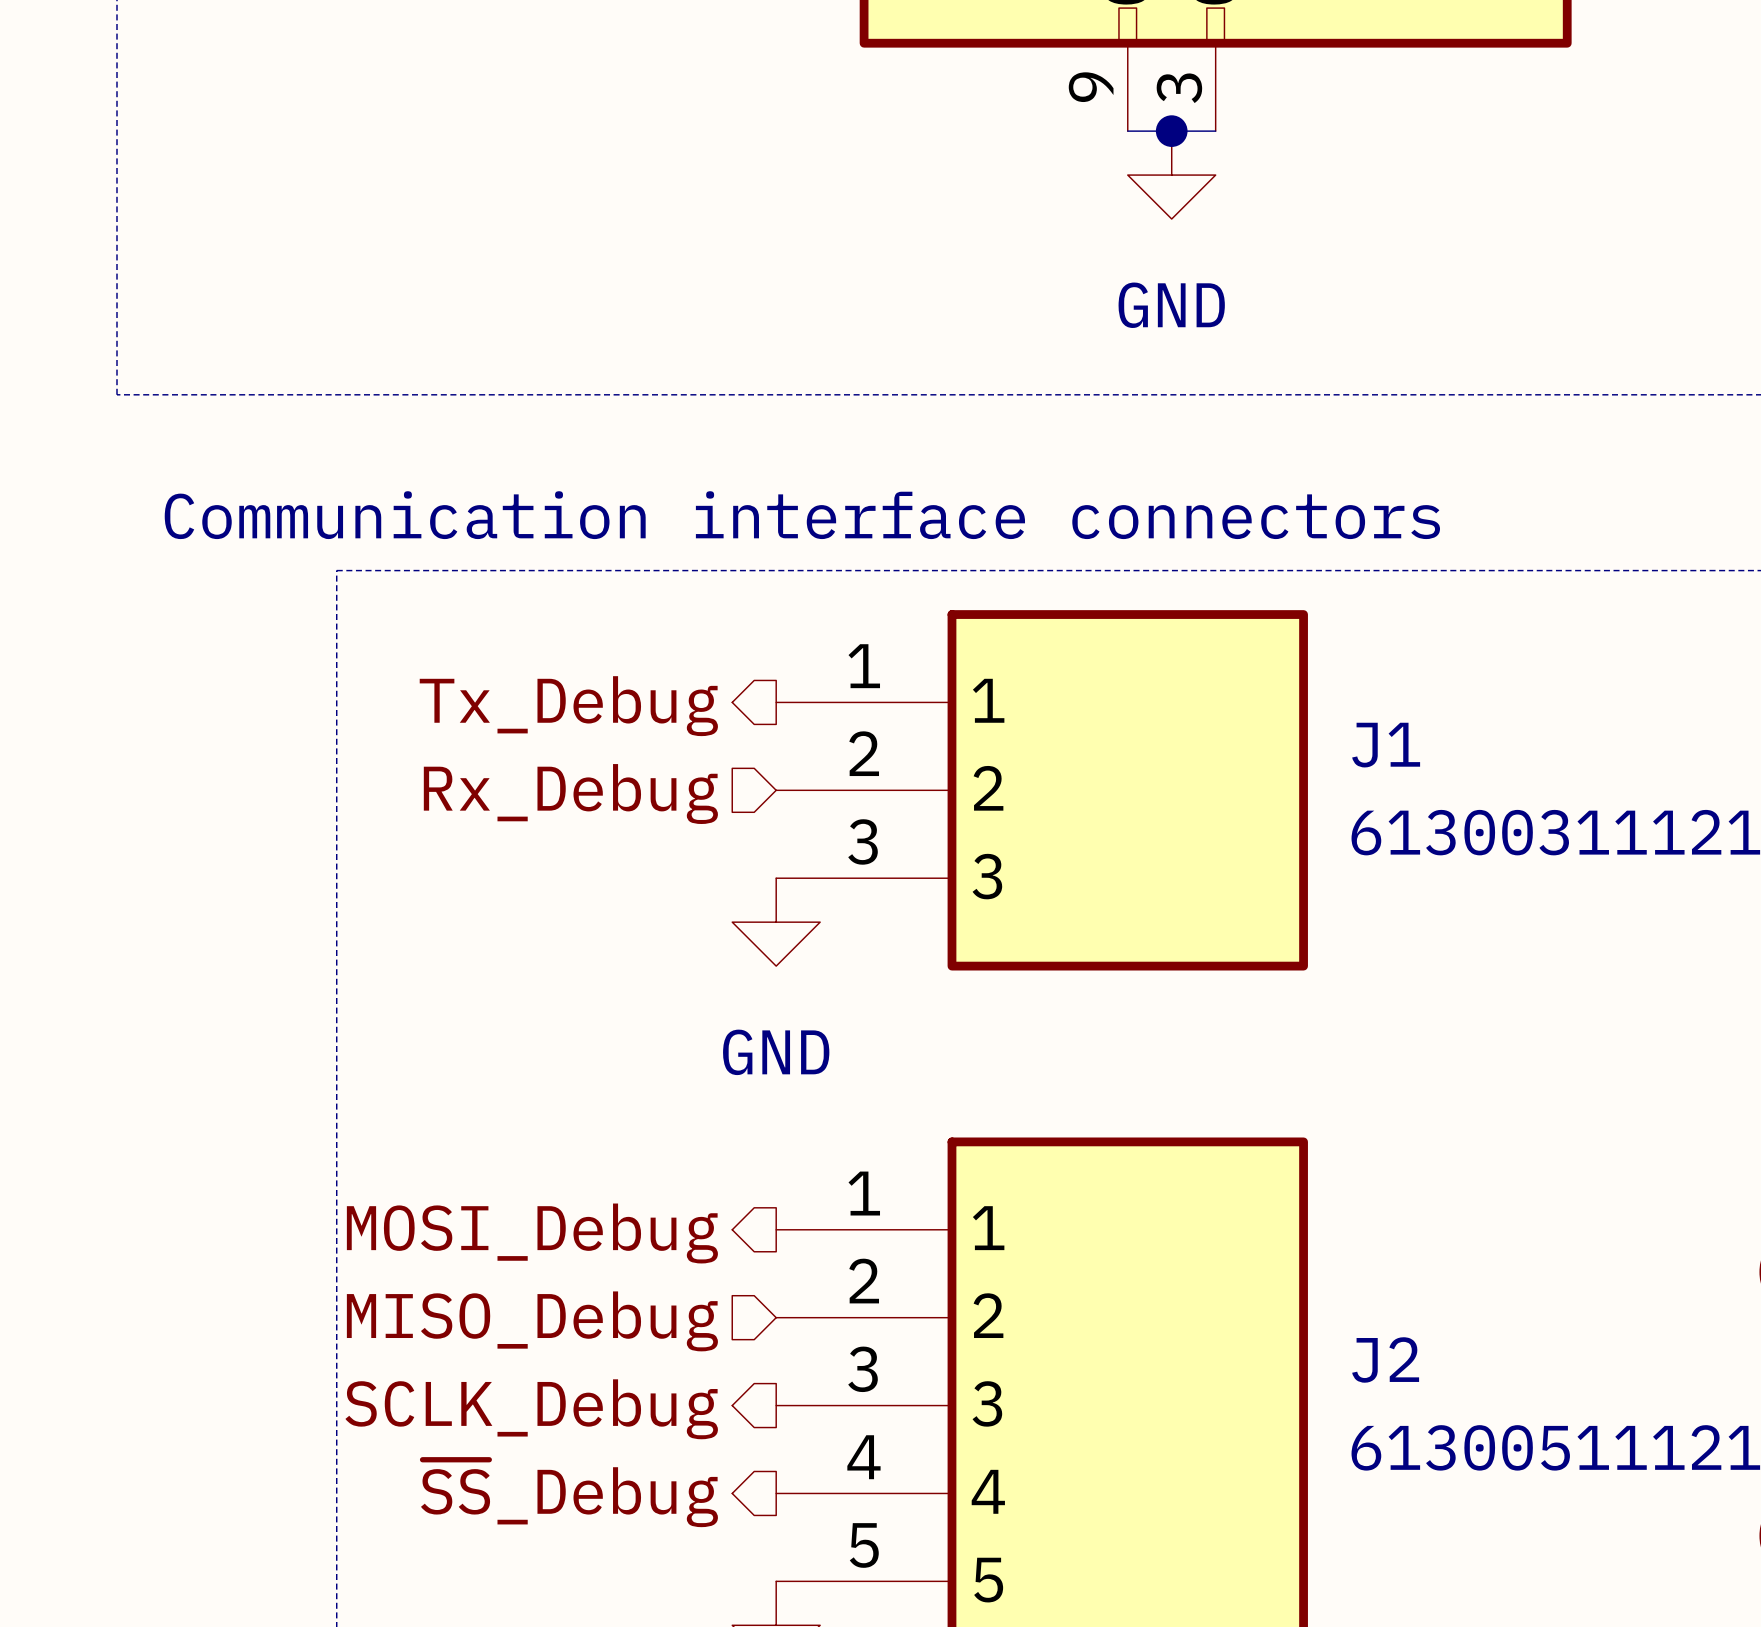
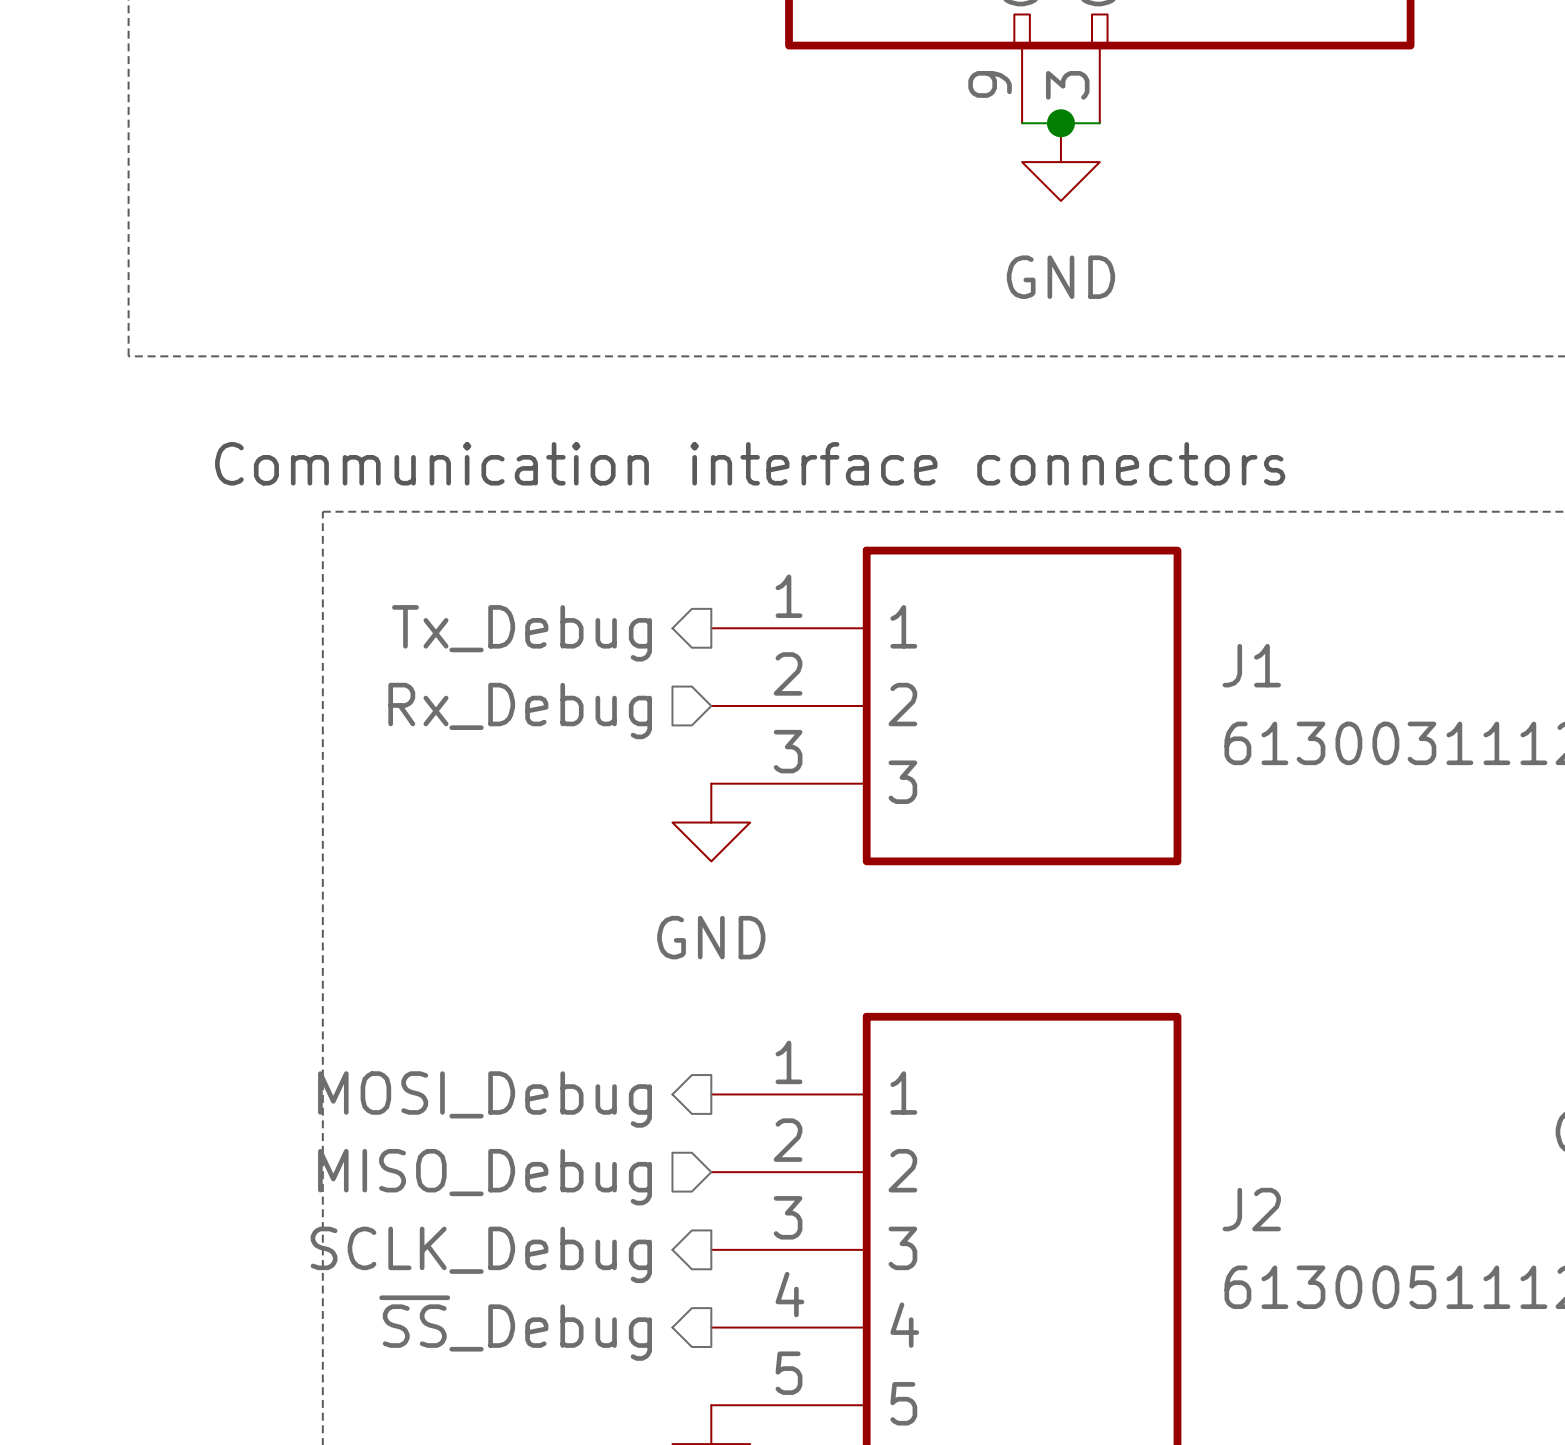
text position: Communication interface connectors (802, 515) -> Communication interface connectors (750, 463)

